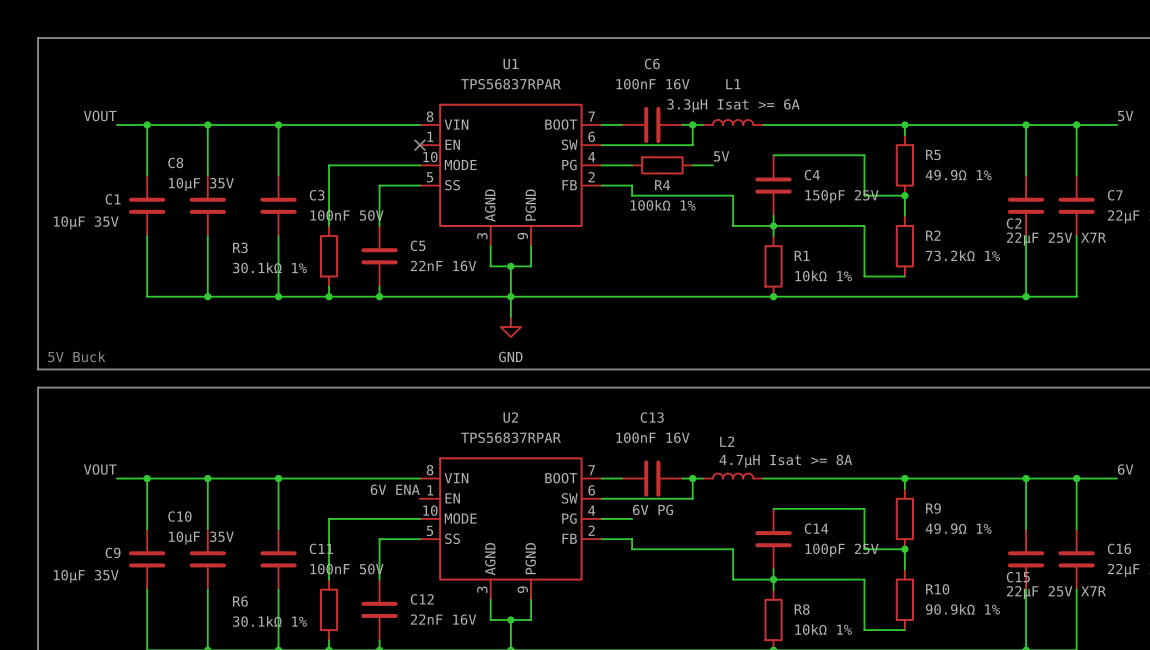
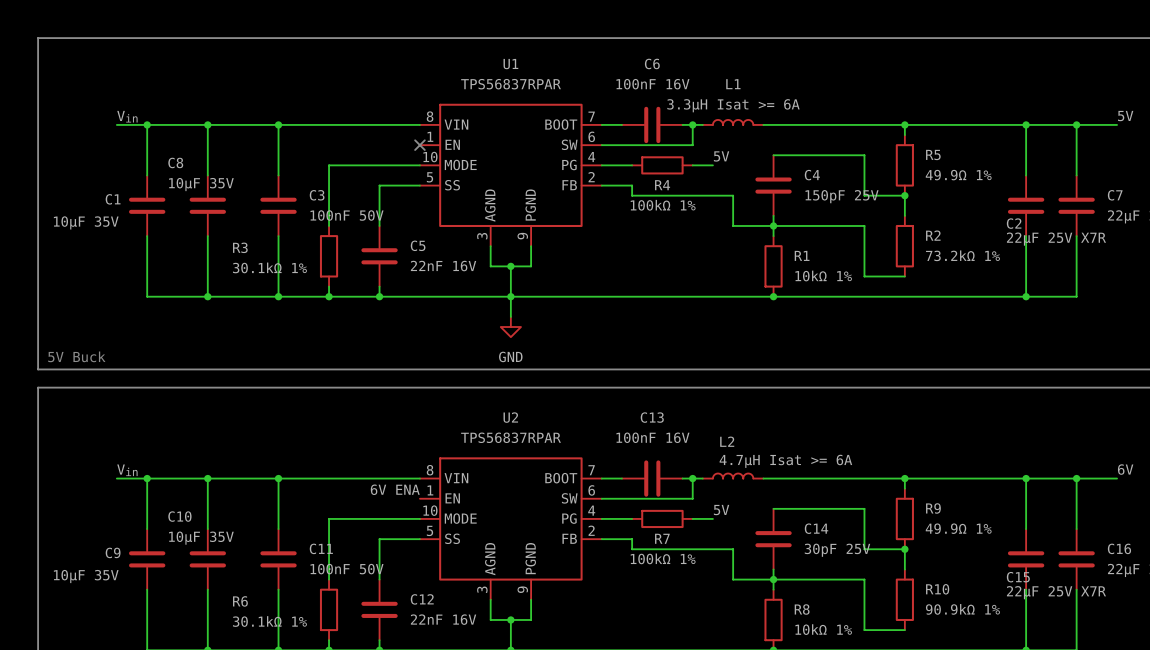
label: VOUT (100, 115) -> Vin (127, 116)
L2 value: 4.7µH Isat >= 8A (785, 461) -> 4.7µH Isat >= 6A (785, 461)
label: VOUT (100, 469) -> Vin (127, 470)
label: 6V PG (652, 509) -> none
label: none -> 5V (721, 510)
R7: none -> 100kΩ 1% (662, 518)
wire: none -> (692, 518) (712, 518)
C14 value: 100pF 25V (842, 550) -> 30pF 25V (837, 550)

